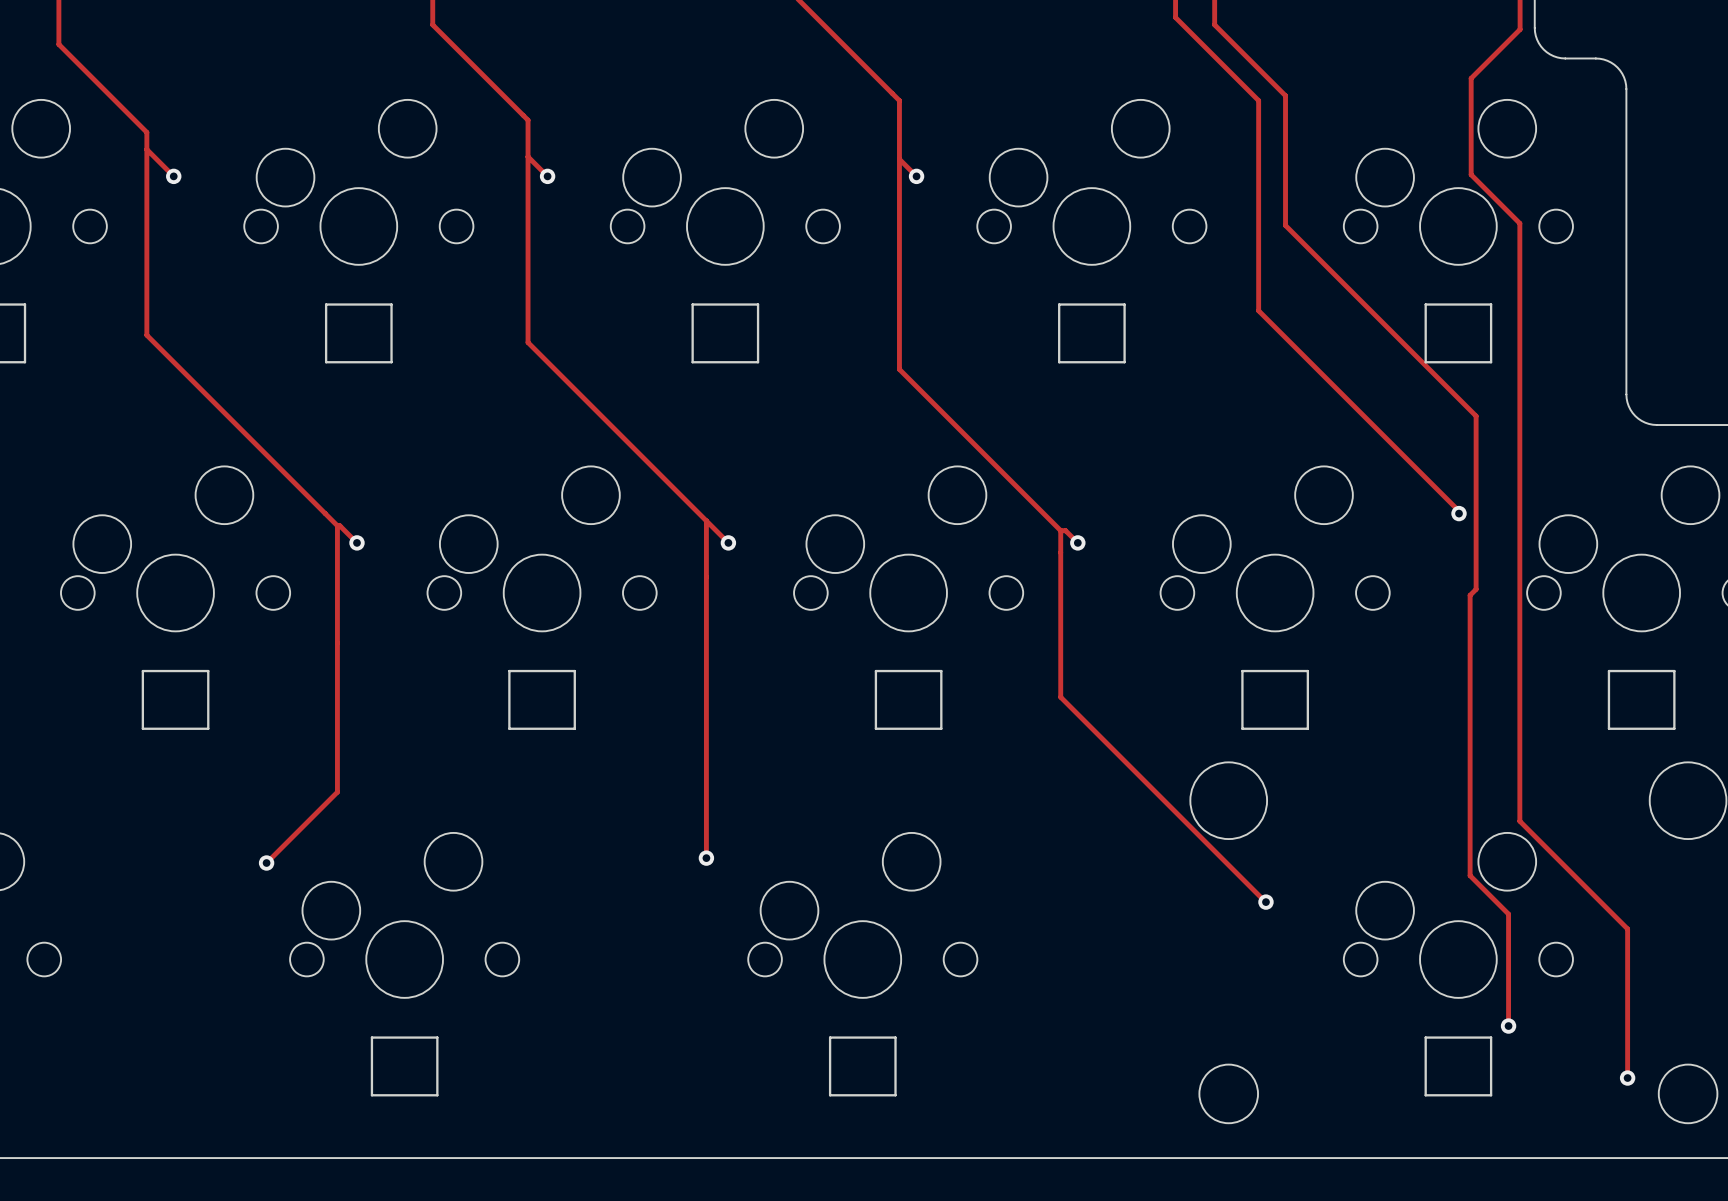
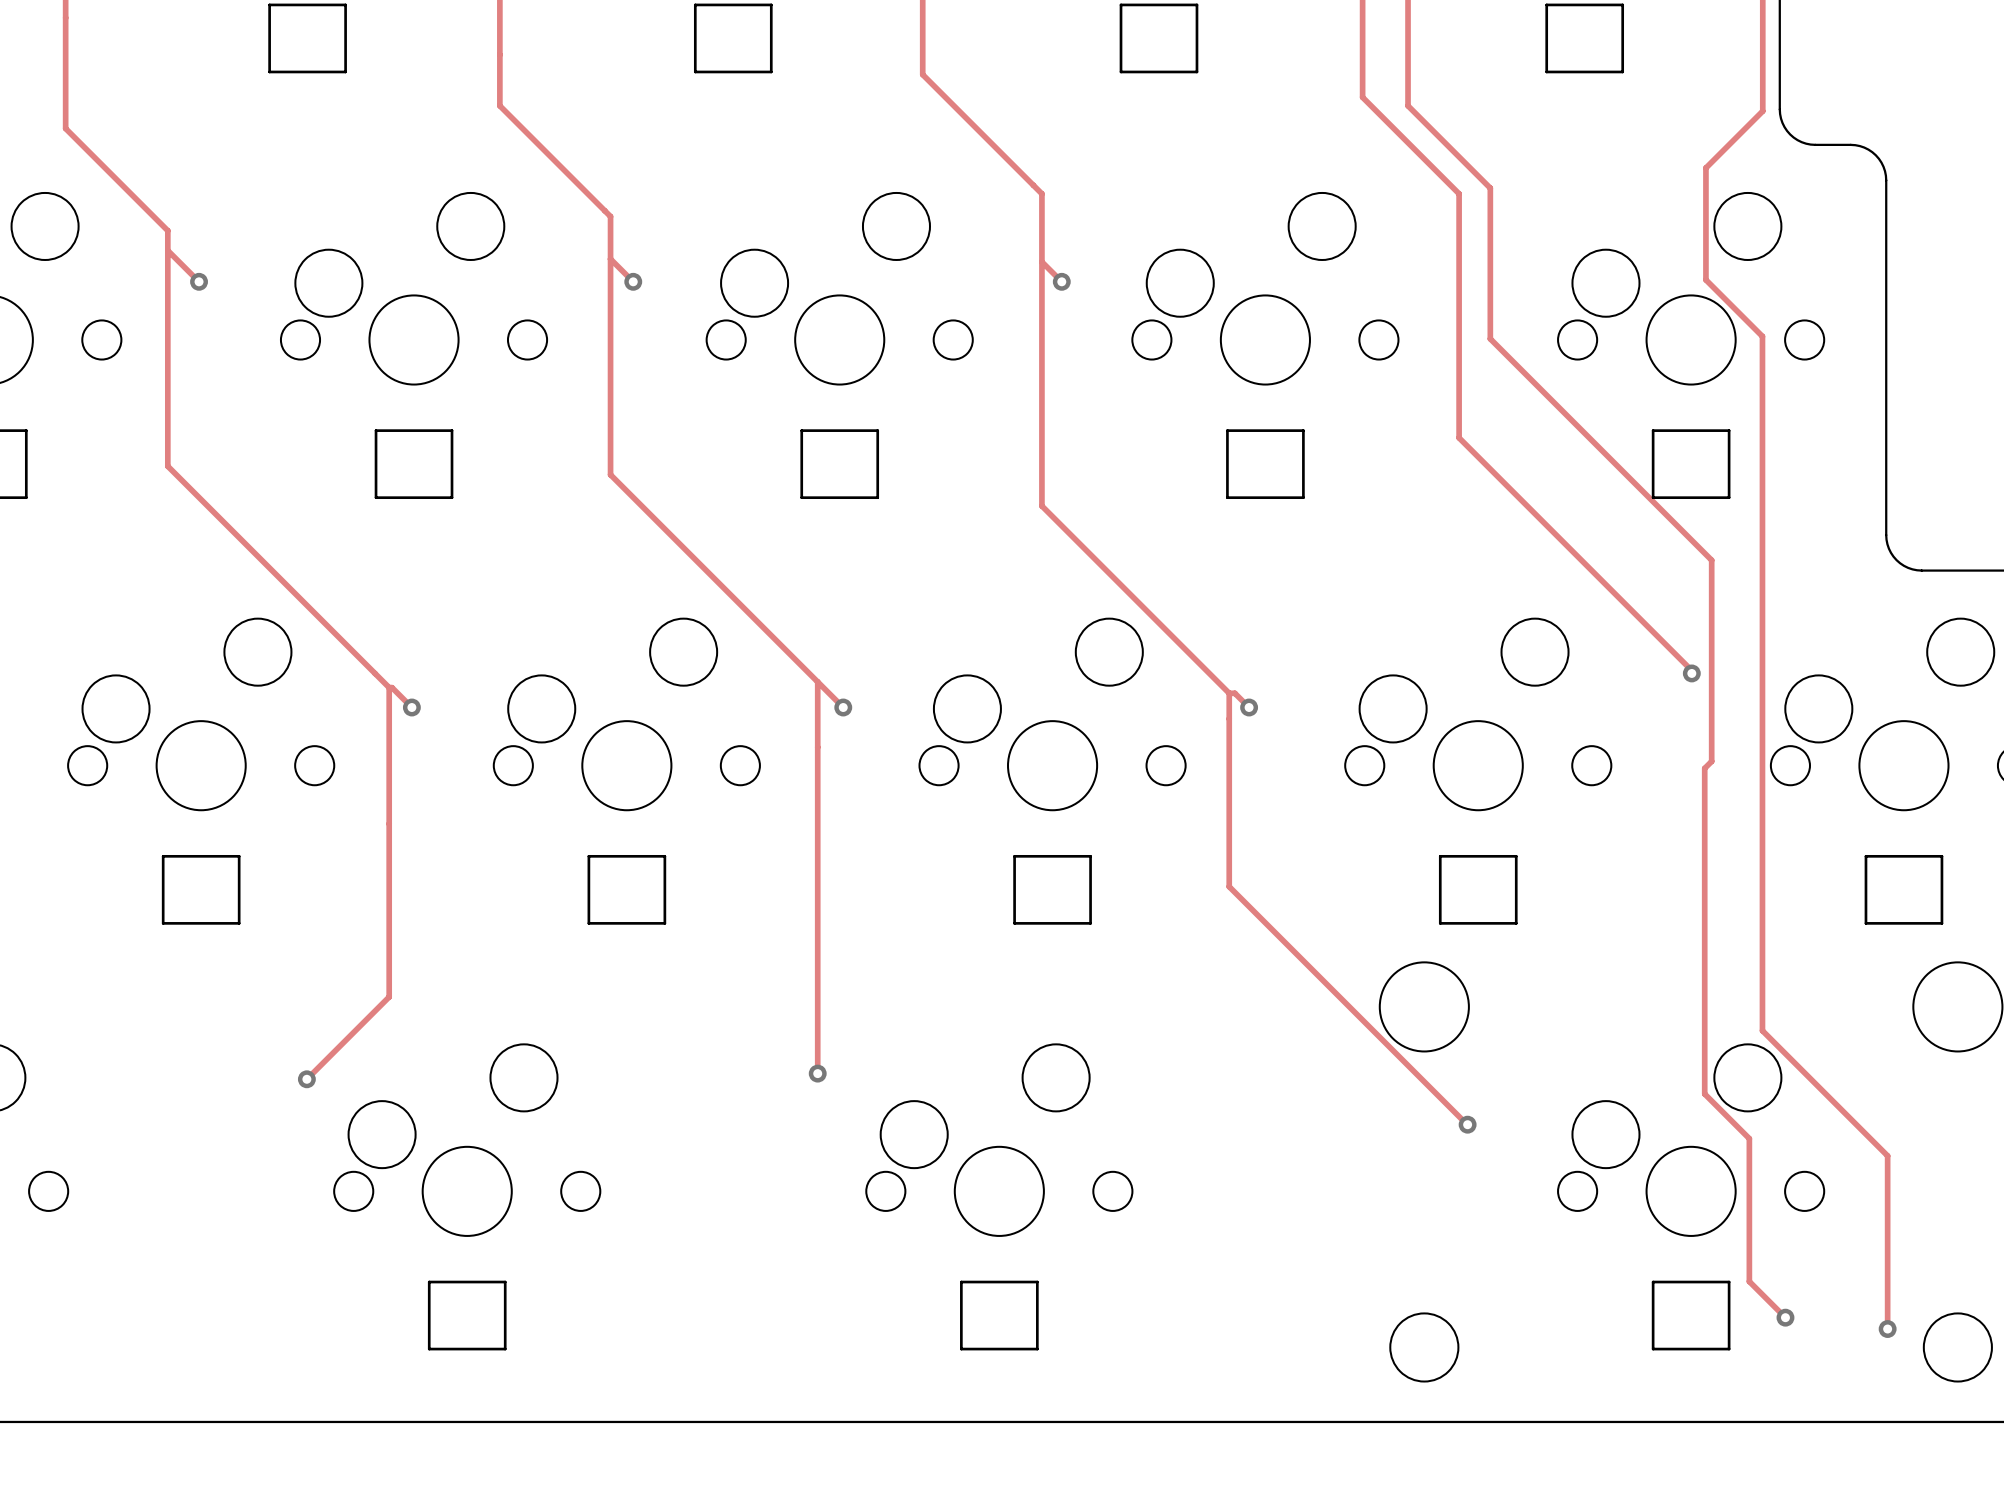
track: none -> (1749, 1268) (1749, 1281) (1785, 1317)
via position: (1508, 1026) -> (1785, 1317)

